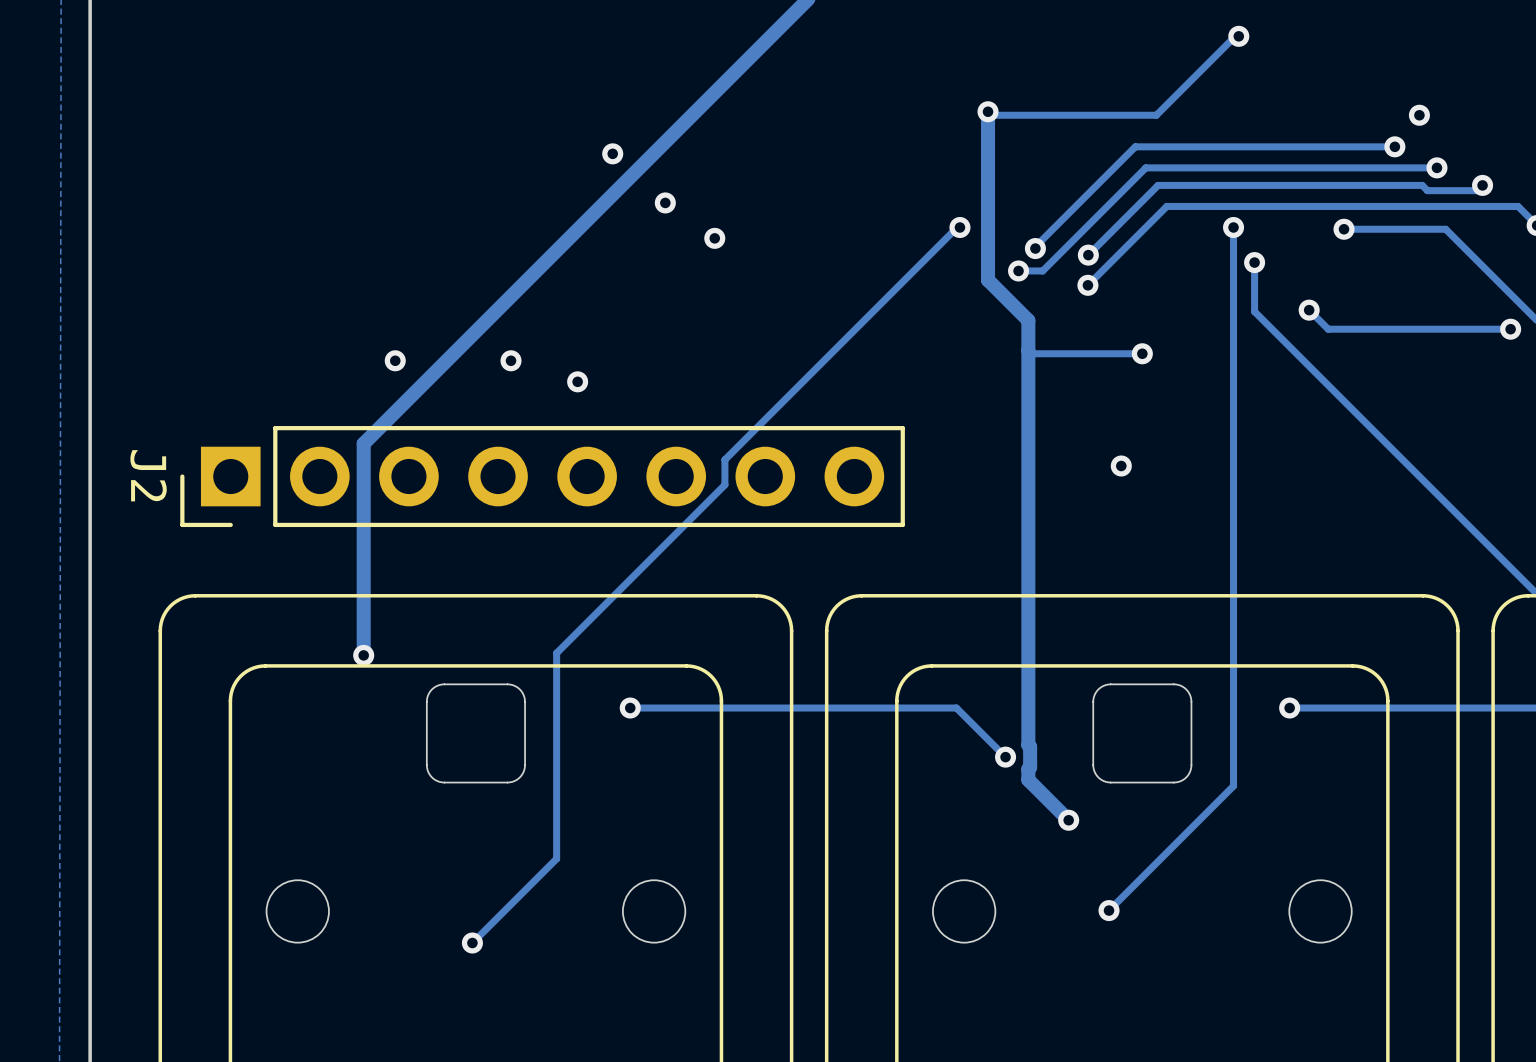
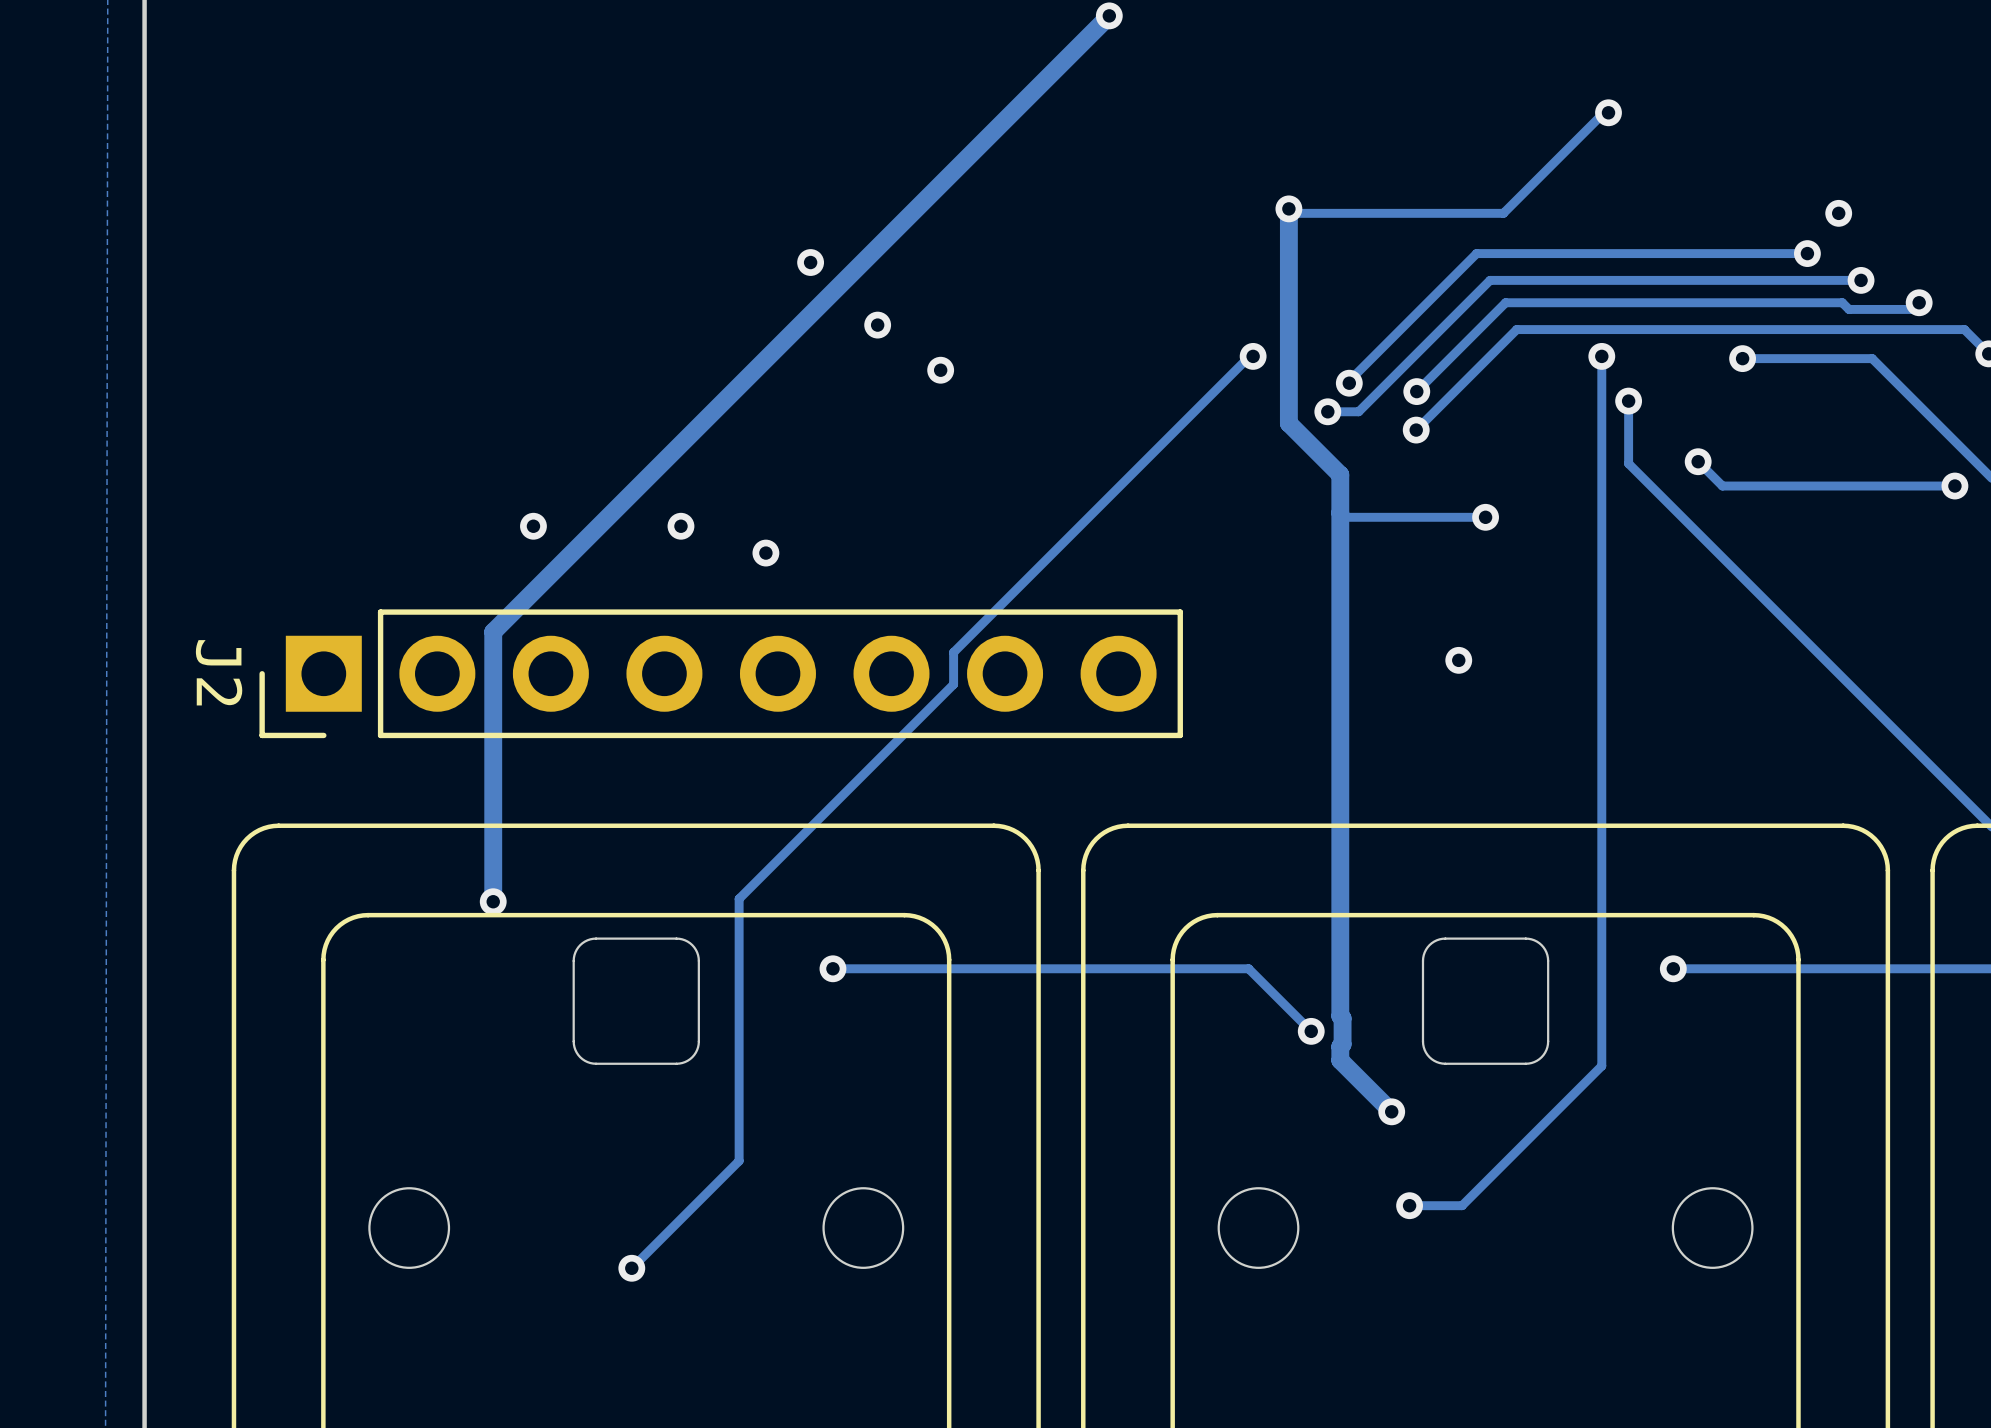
track: (1233, 784) (1109, 910) -> (1601, 1066) (1462, 1205) (1409, 1205)
via position: (1109, 910) -> (1409, 1205)

